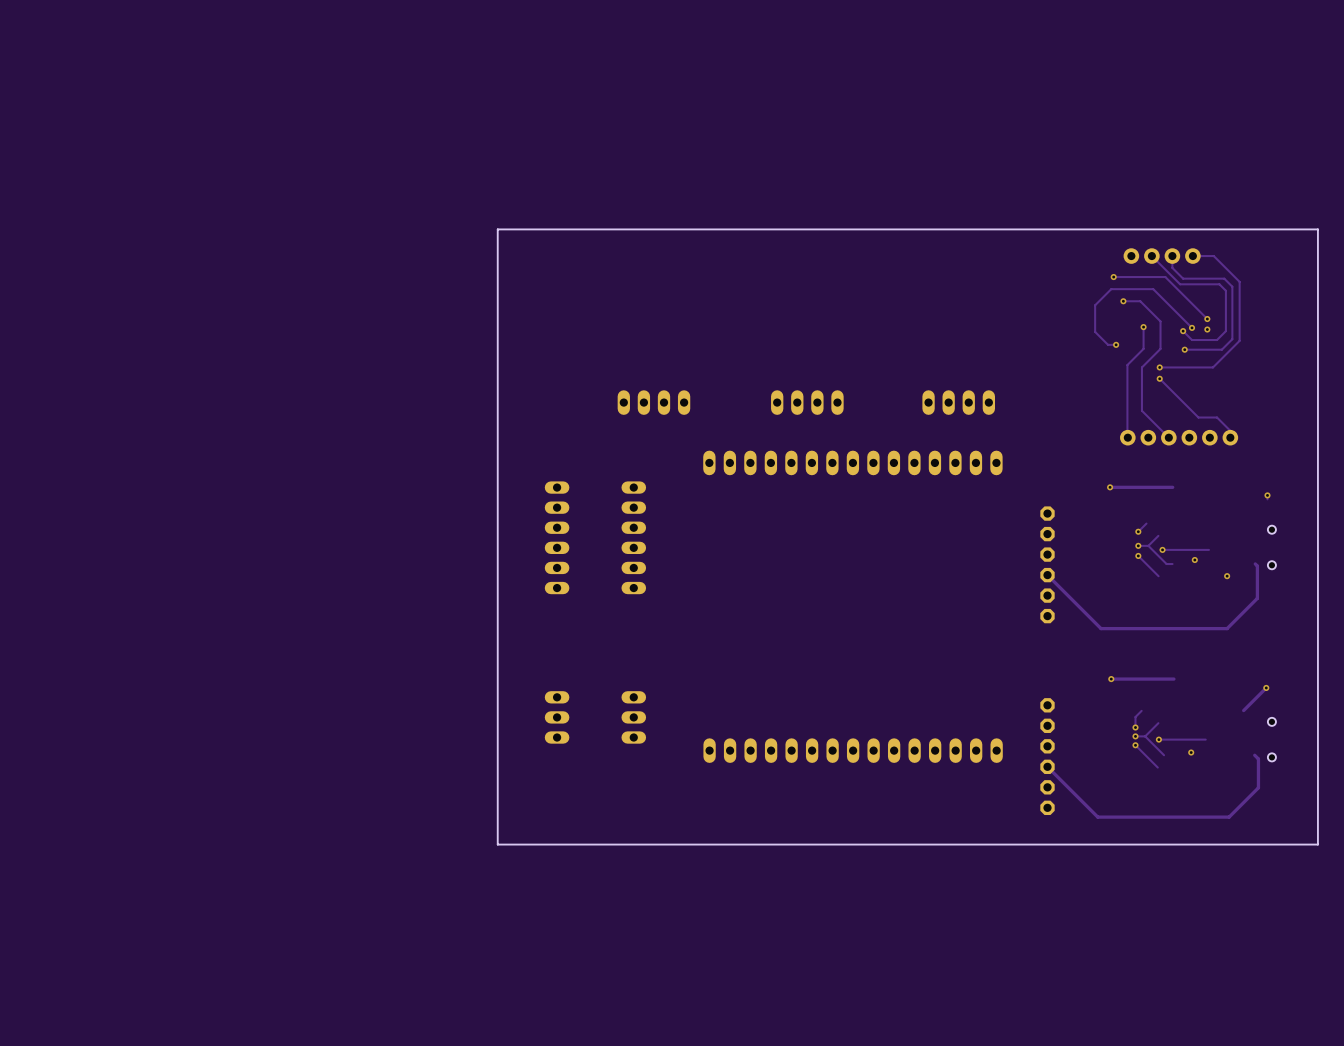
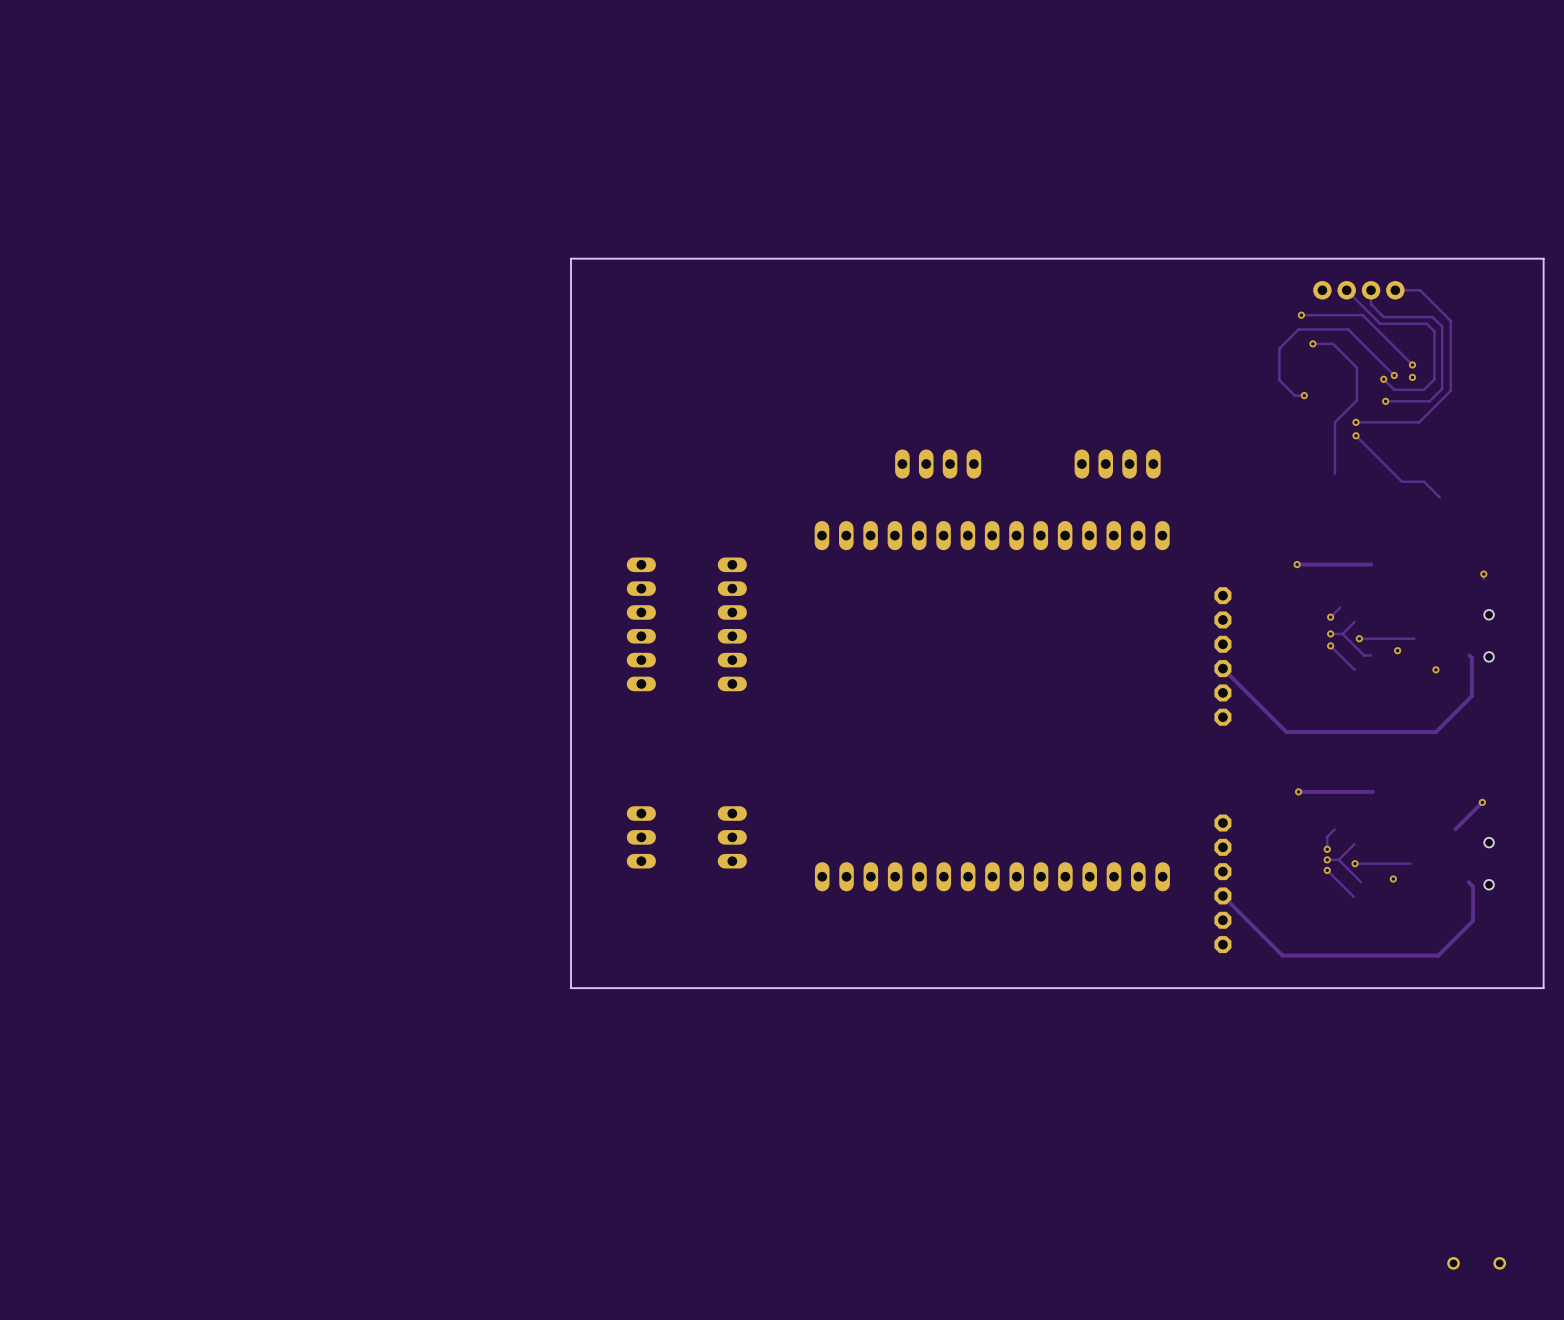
track: (1143, 327) (1143, 348) (1127, 365) (1127, 437) -> none
via: (1143, 327) -> none
part: (653, 402) -> none
track: (1141, 410) (1168, 437) -> none
part: (1179, 437) -> none

